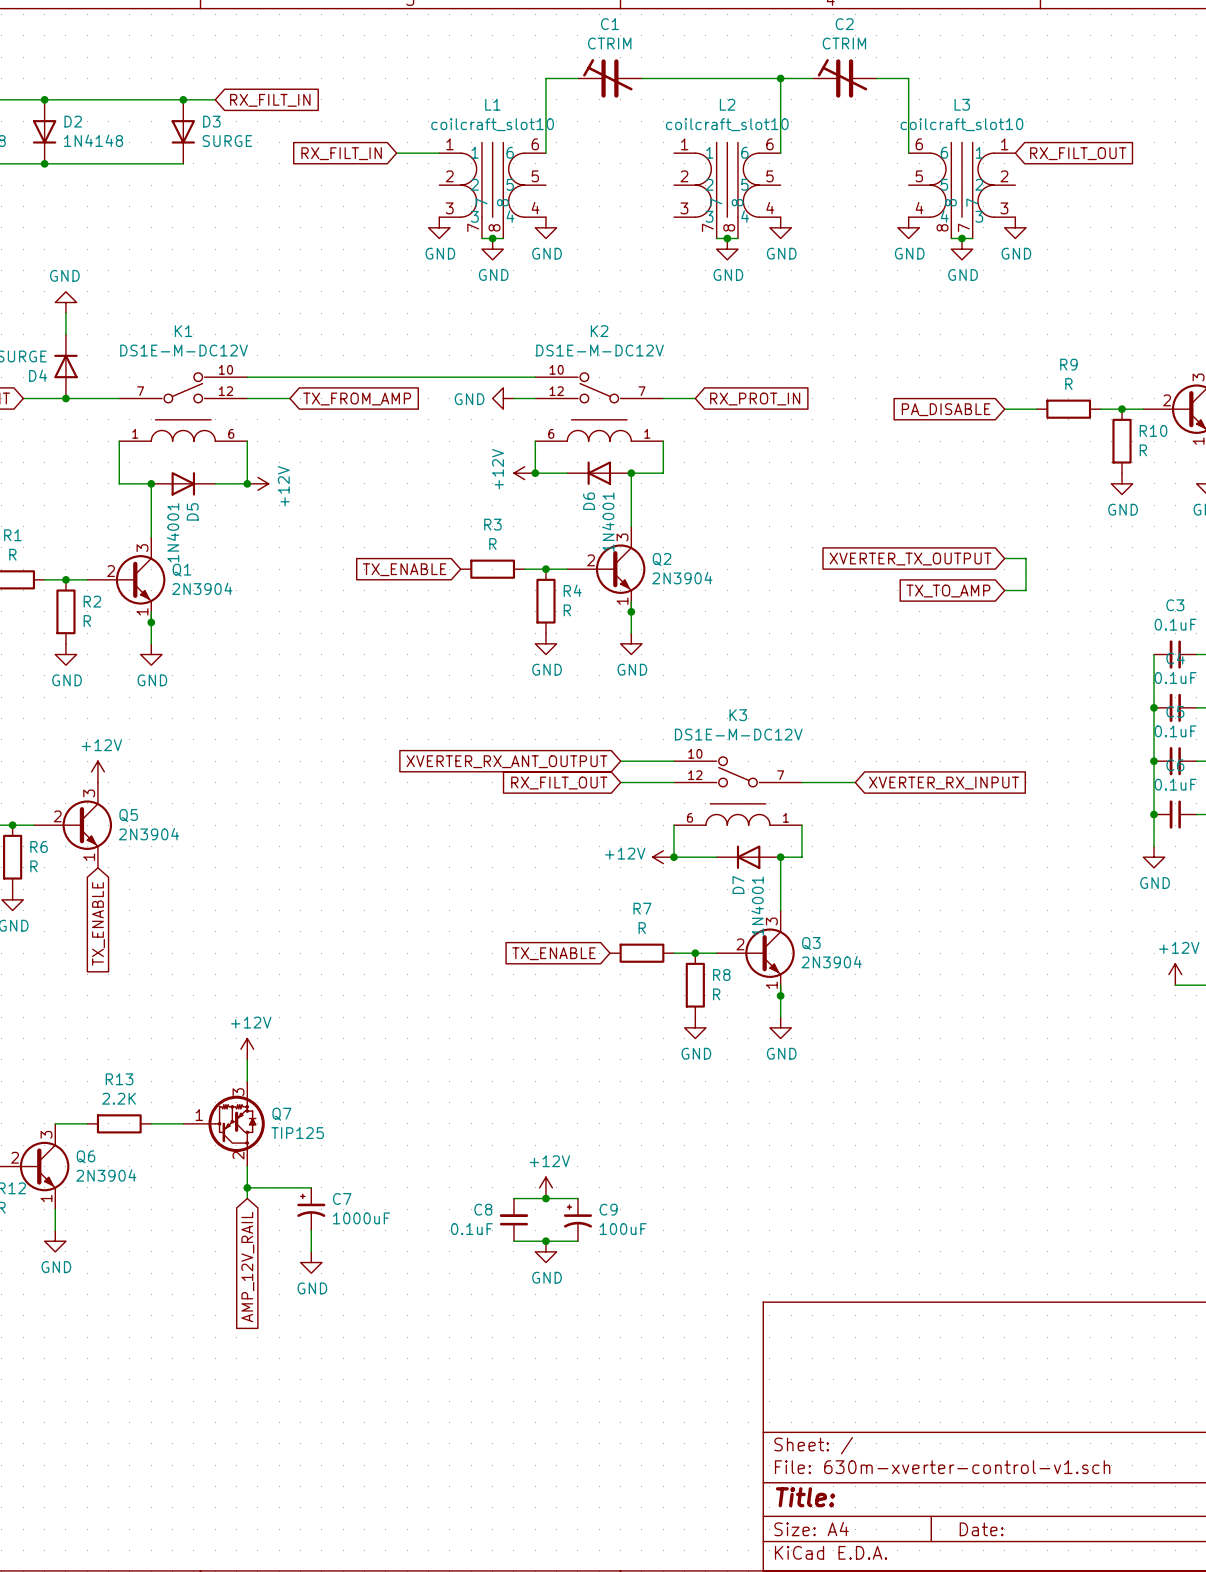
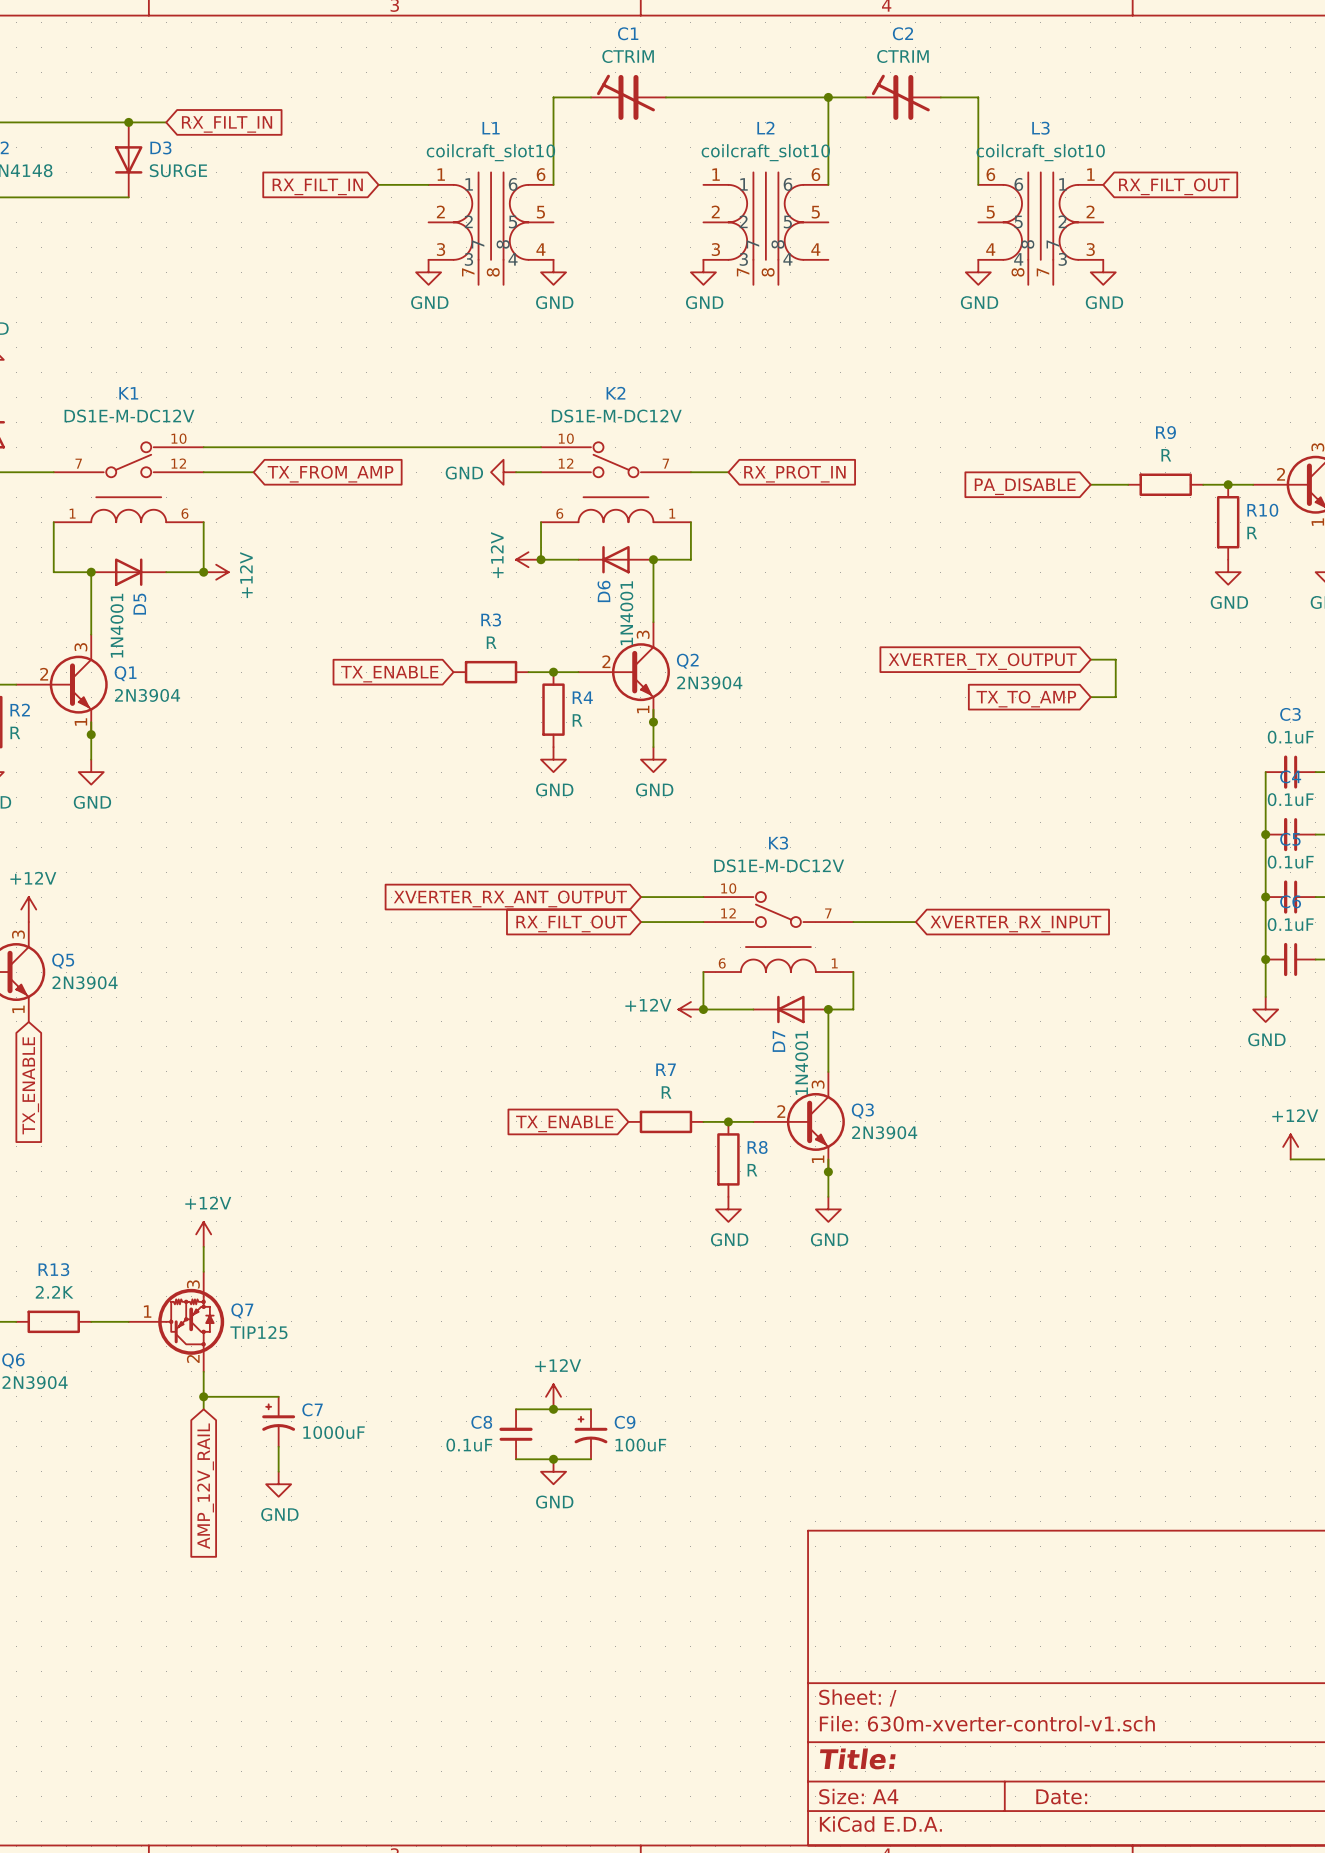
power symbol: none -> GND (703, 272)
power symbol: GND (780, 227) -> none
wire: (481, 238) (503, 238) -> none
junction: (492, 238) -> none
wire: (716, 238) (737, 238) -> none
junction: (727, 238) -> none
wire: (951, 238) (972, 238) -> none
junction: (962, 238) -> none
power symbol: GND (492, 249) -> none
power symbol: GND (727, 249) -> none
power symbol: GND (962, 249) -> none

